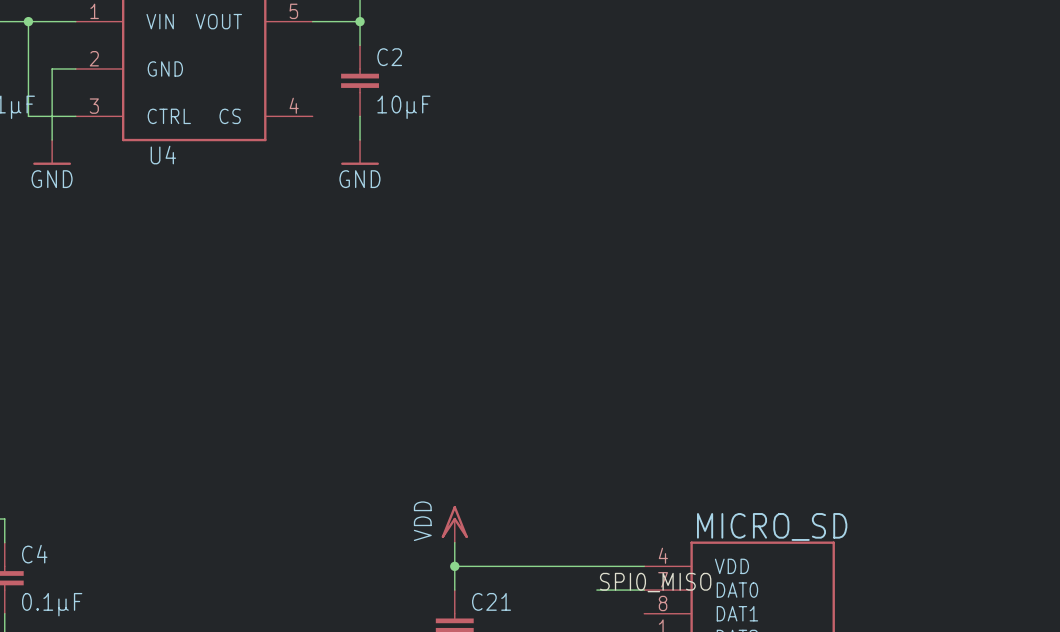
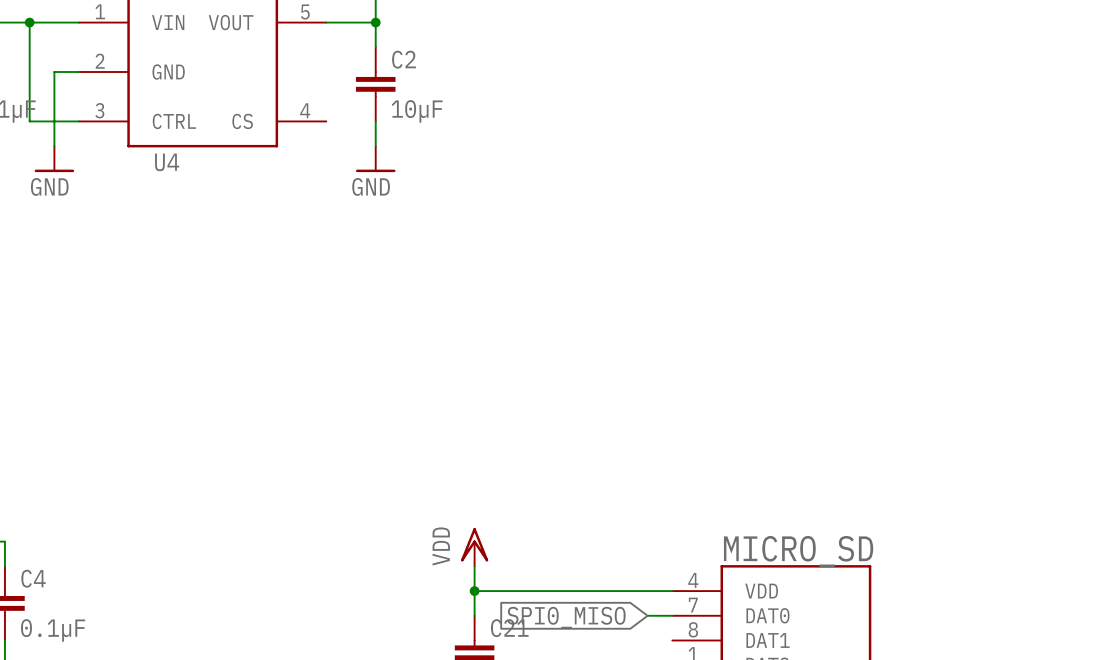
label: SPI0_MISO (655, 582) -> none
global label: none -> SPI0_MISO (566, 617)
wire: (596, 590) (620, 590) -> none

